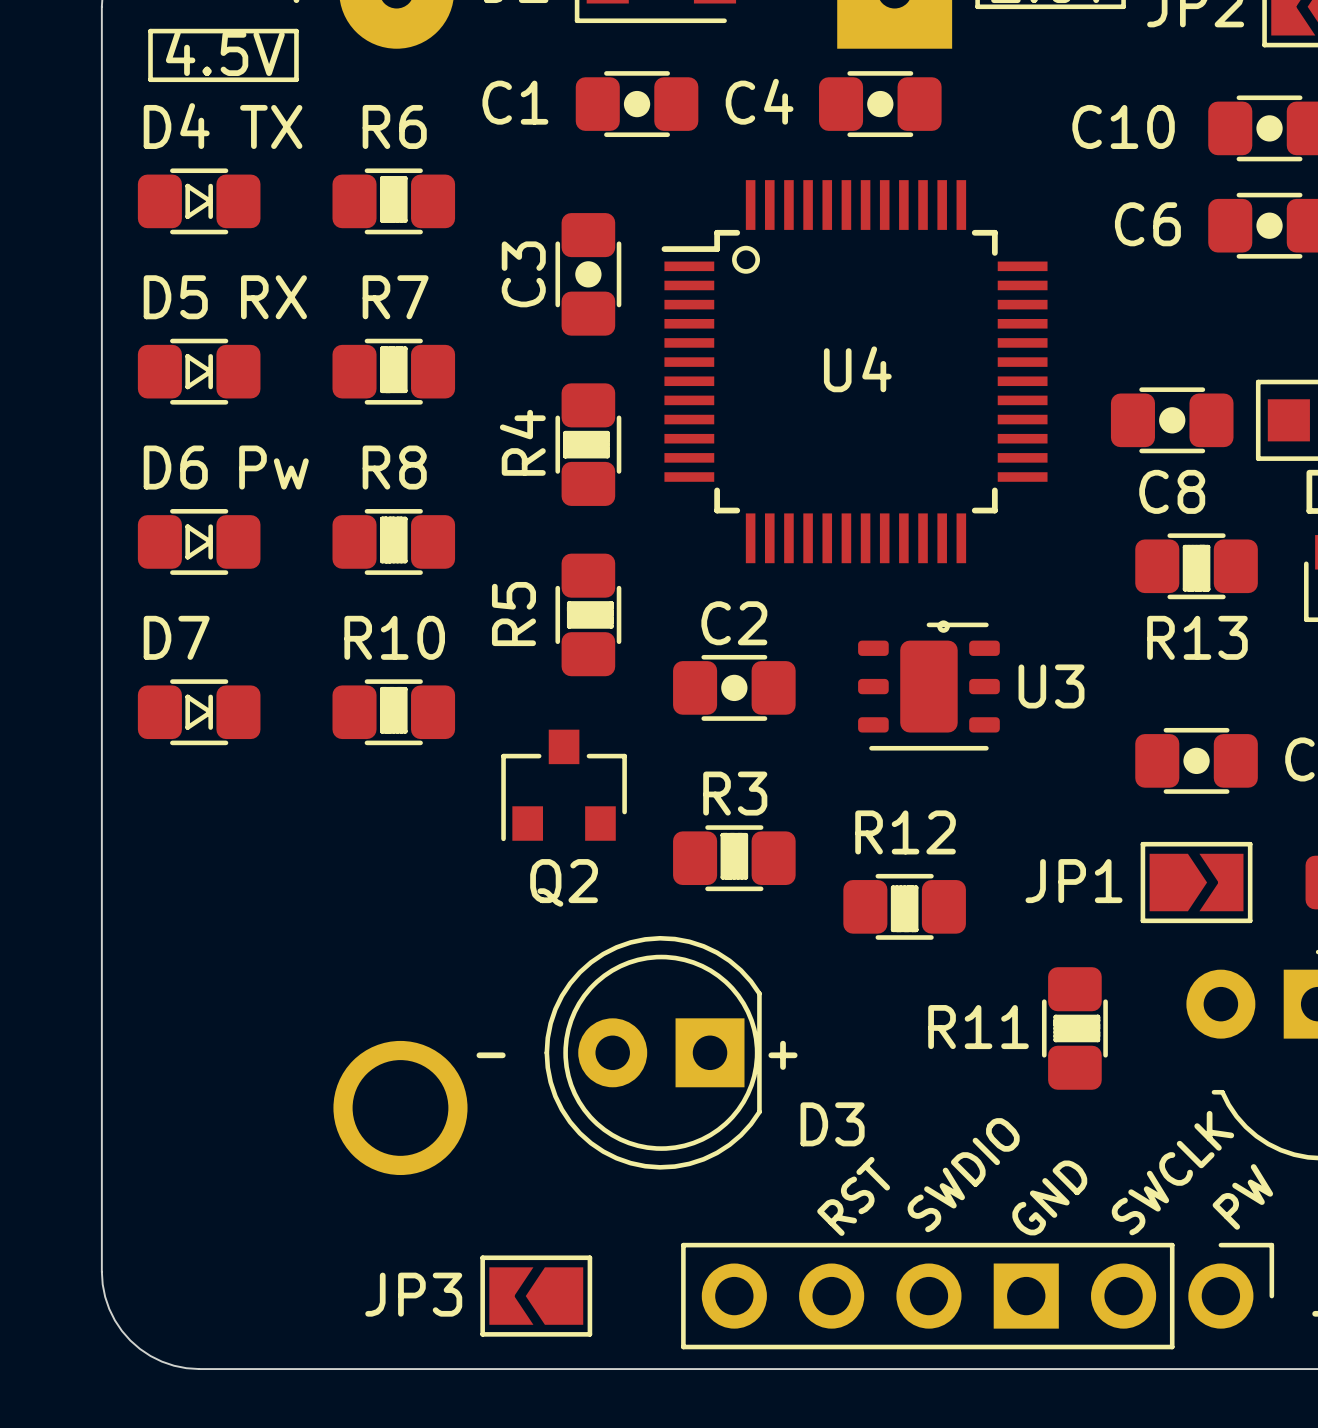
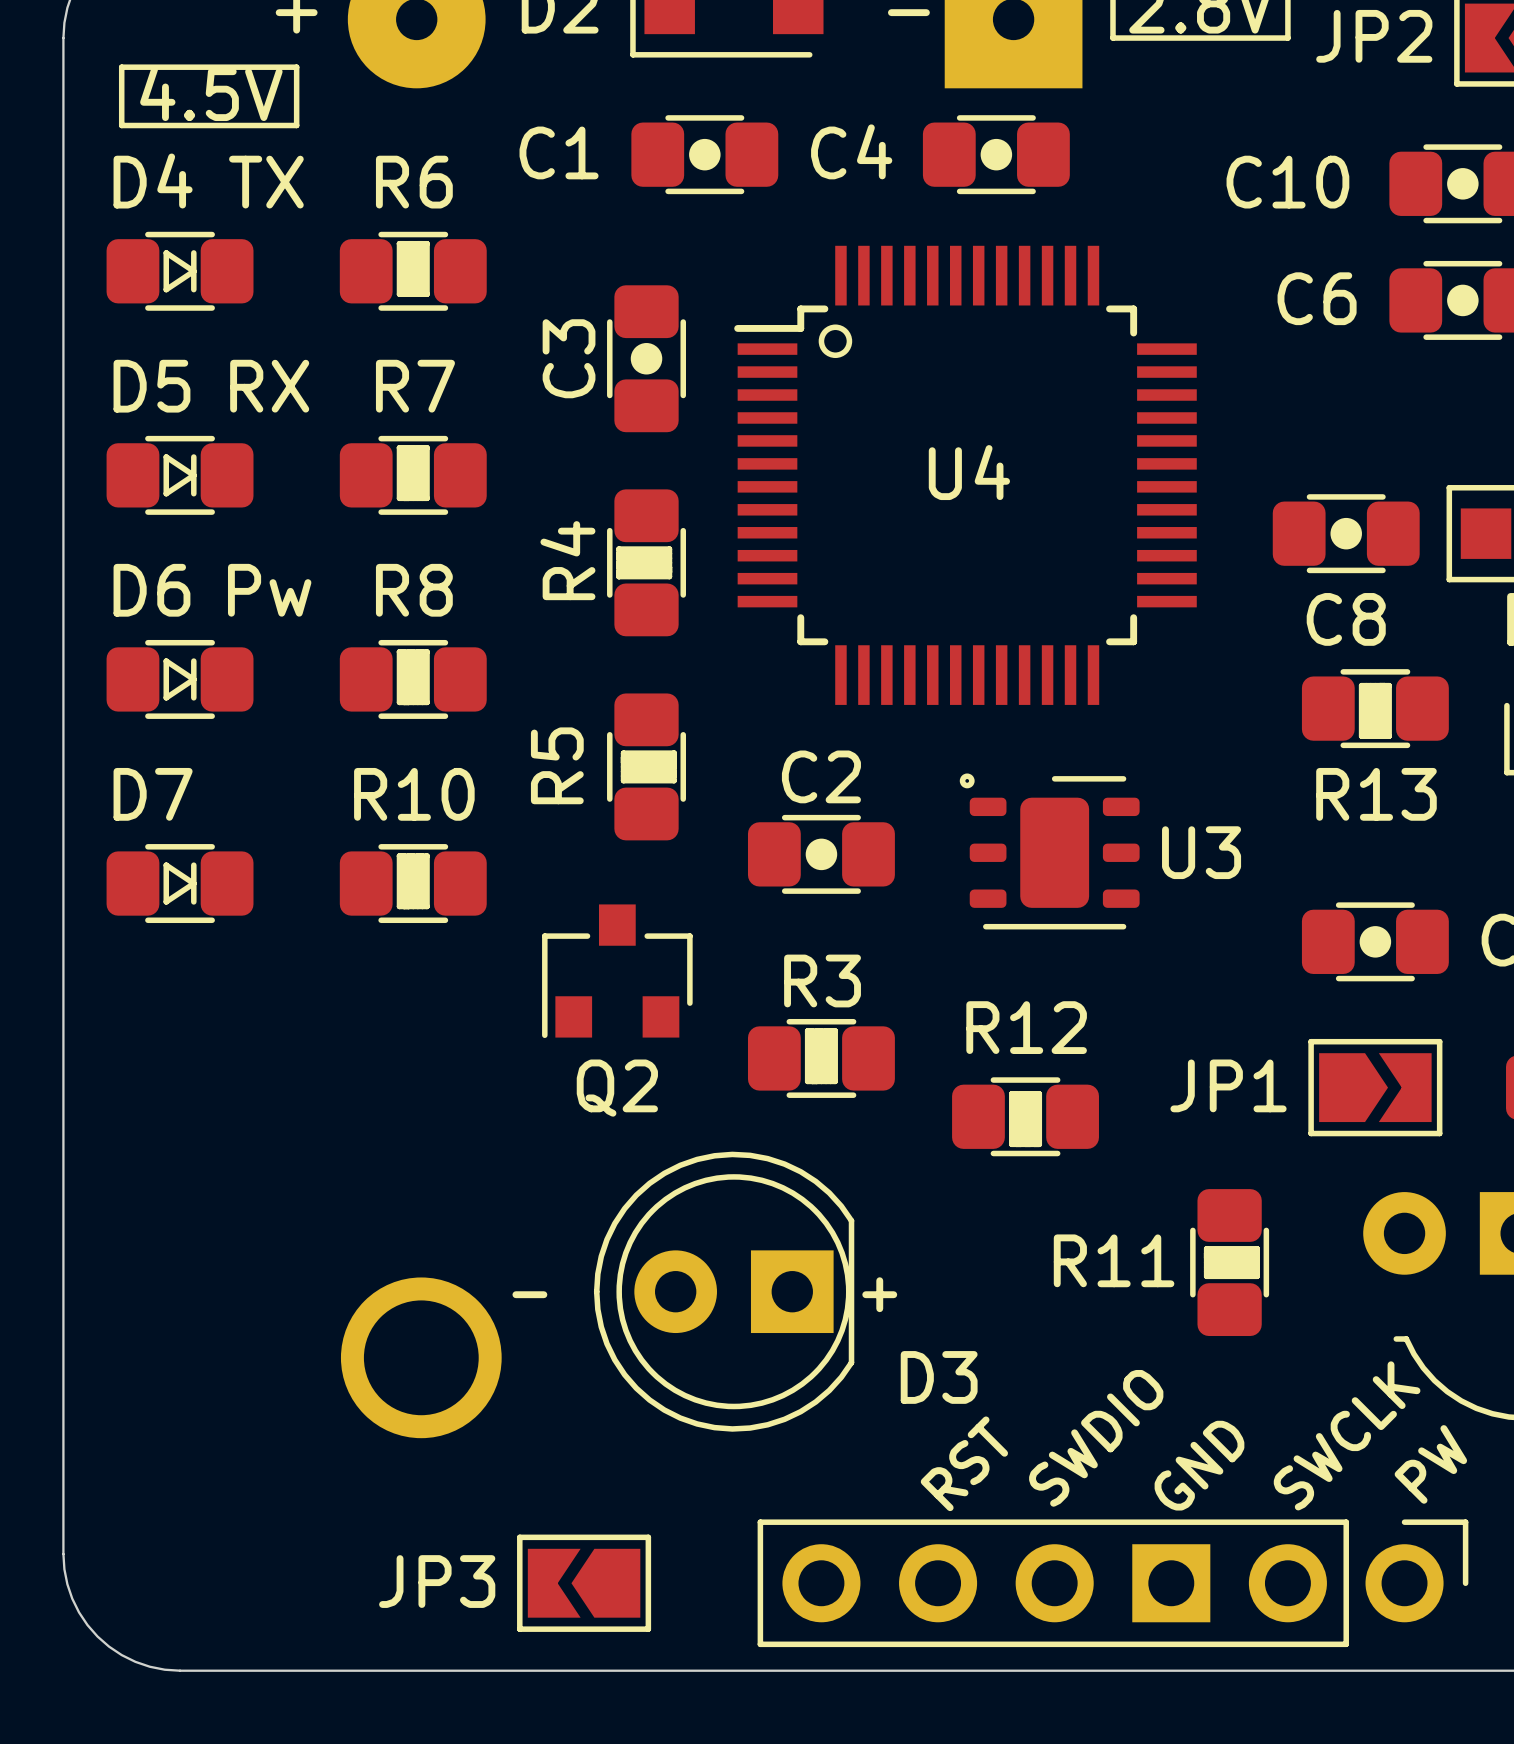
drawing position: (943, 626) -> (967, 780)

